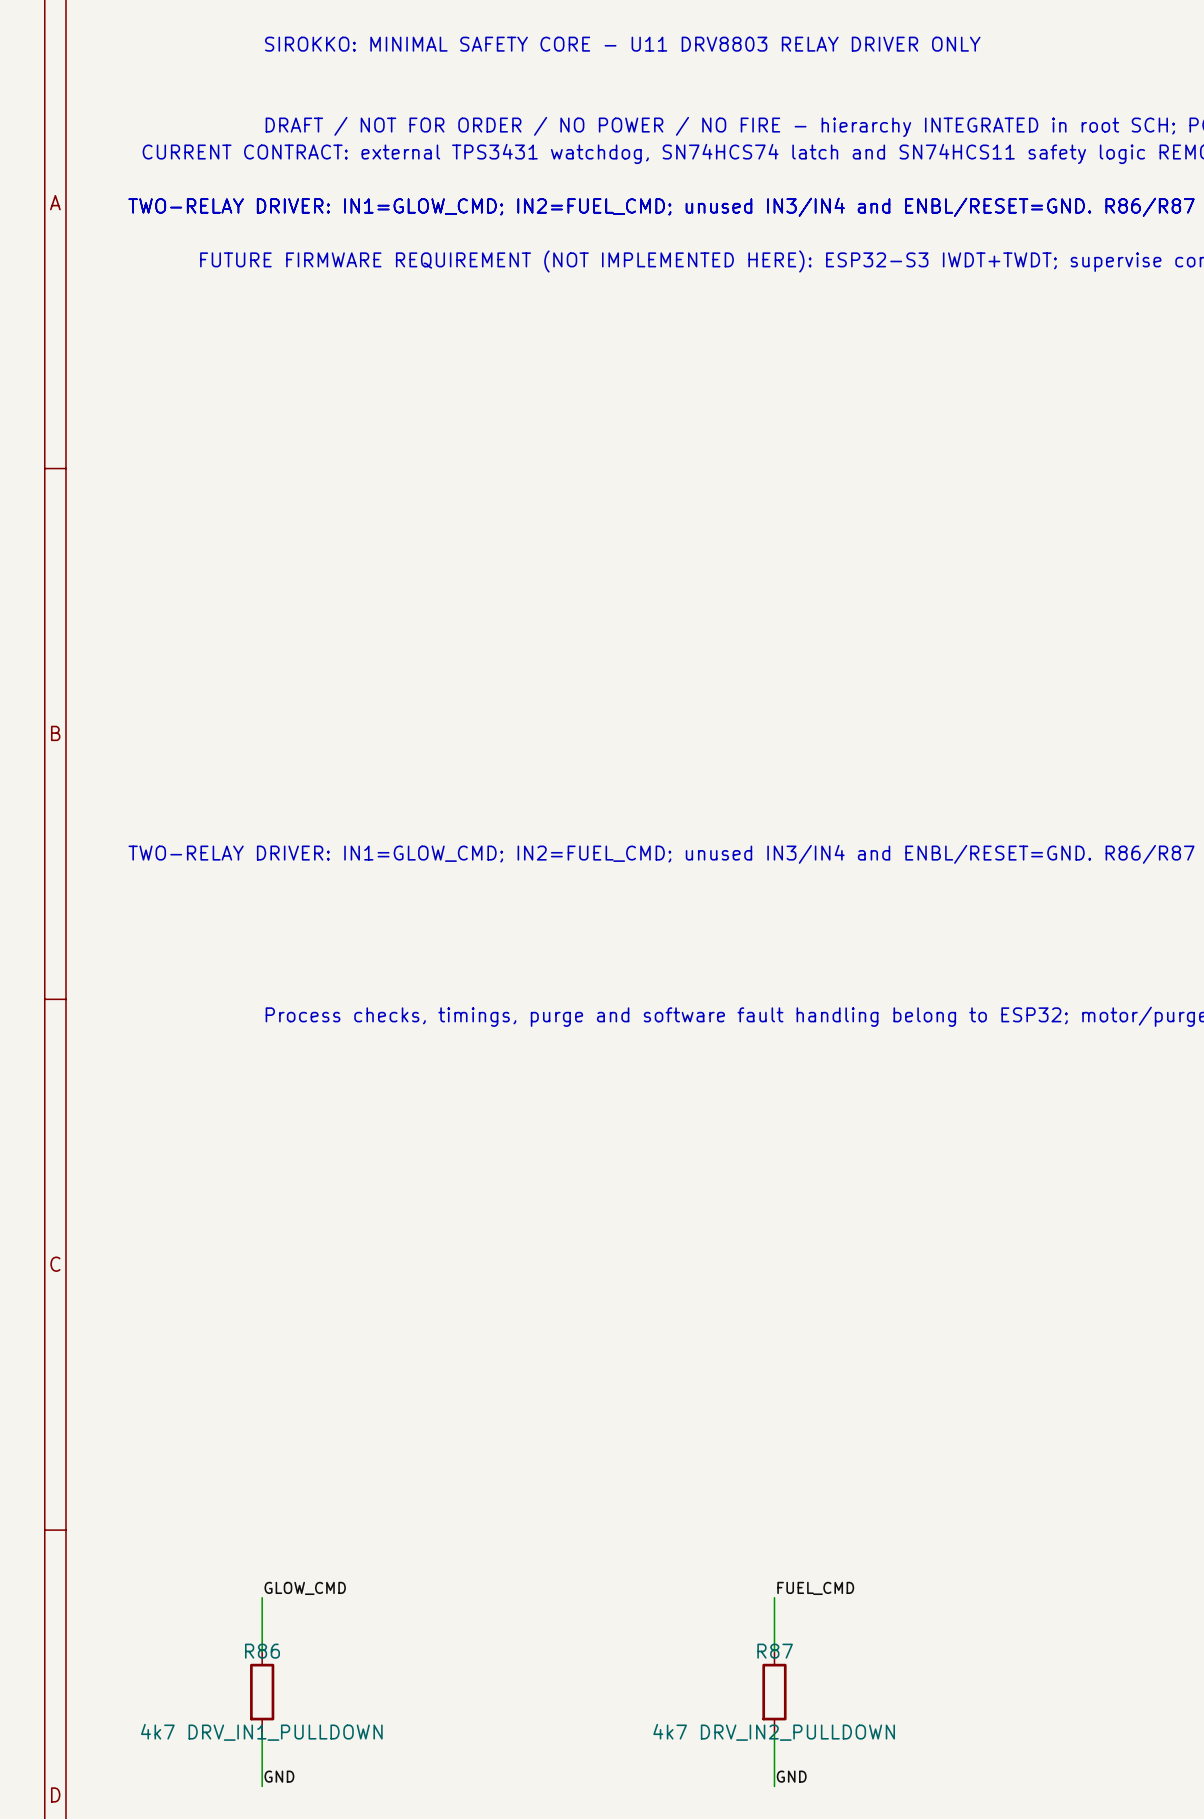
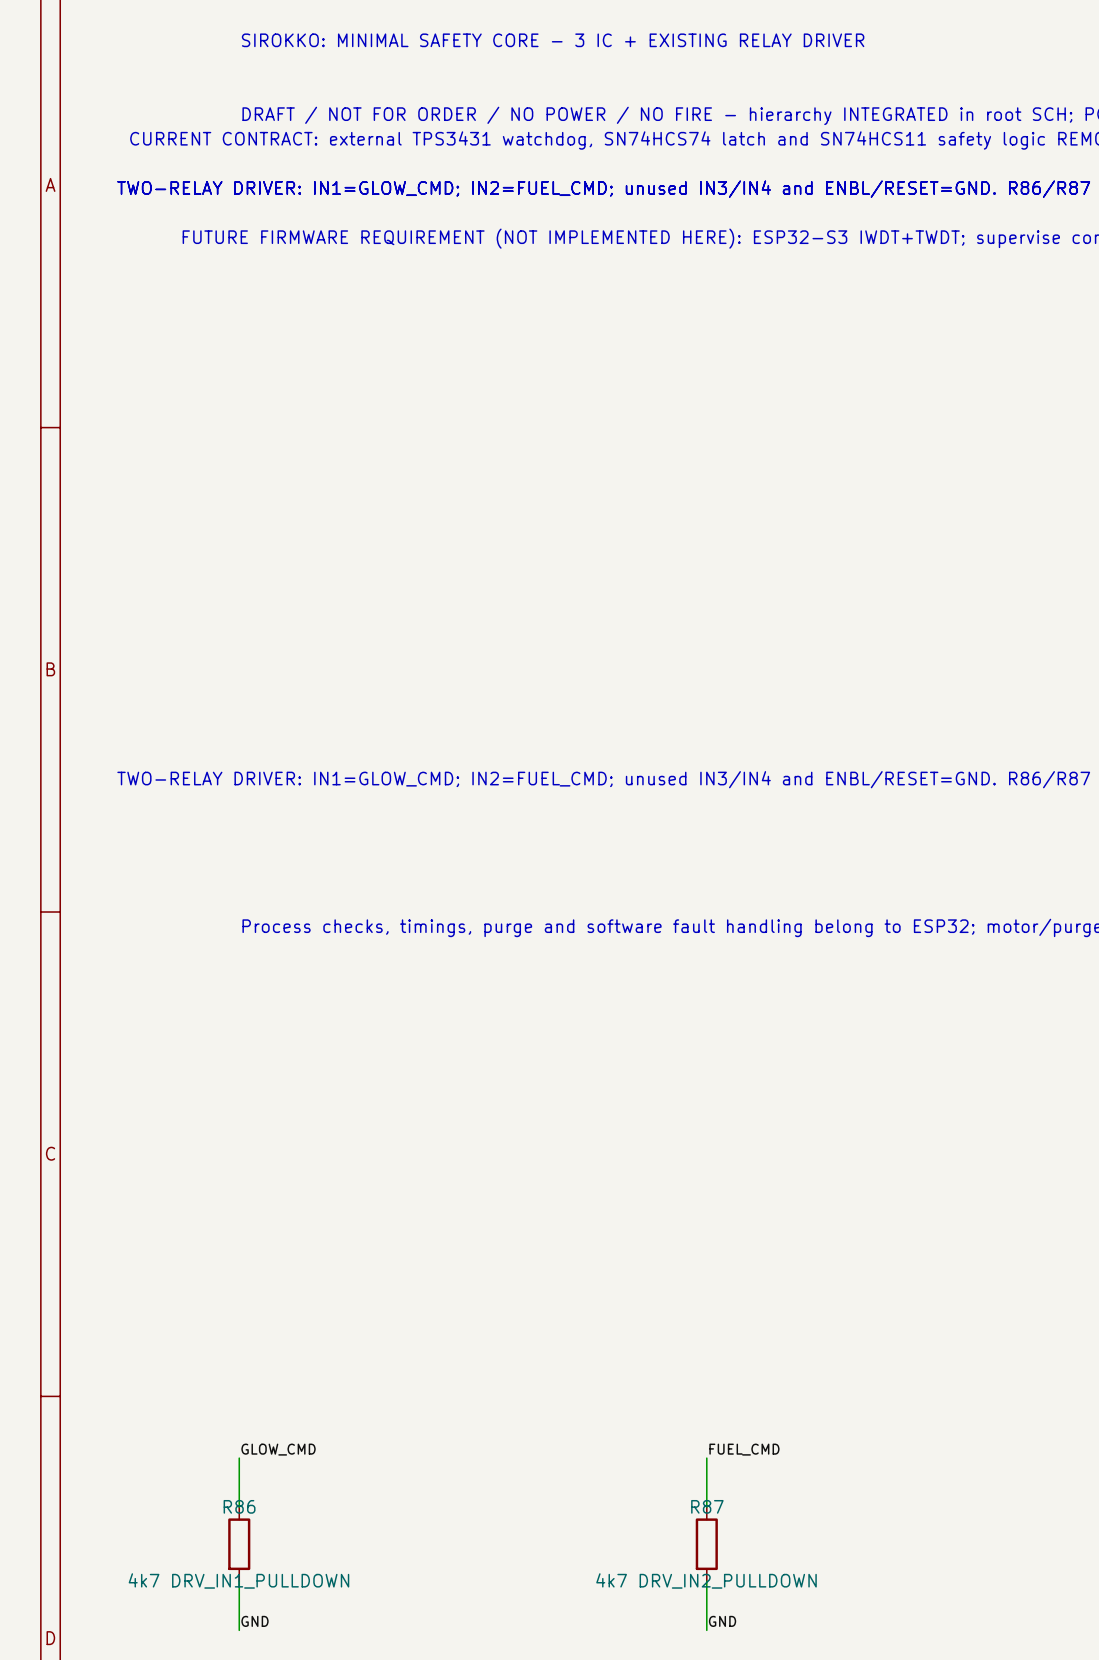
text: SIROKKO: MINIMAL SAFETY CORE - U11 DRV8803 RELAY DRIVER ONLY (622, 44) -> SIROKKO: MINIMAL SAFETY CORE - 3 IC + EXISTING RELAY DRIVER (553, 40)

